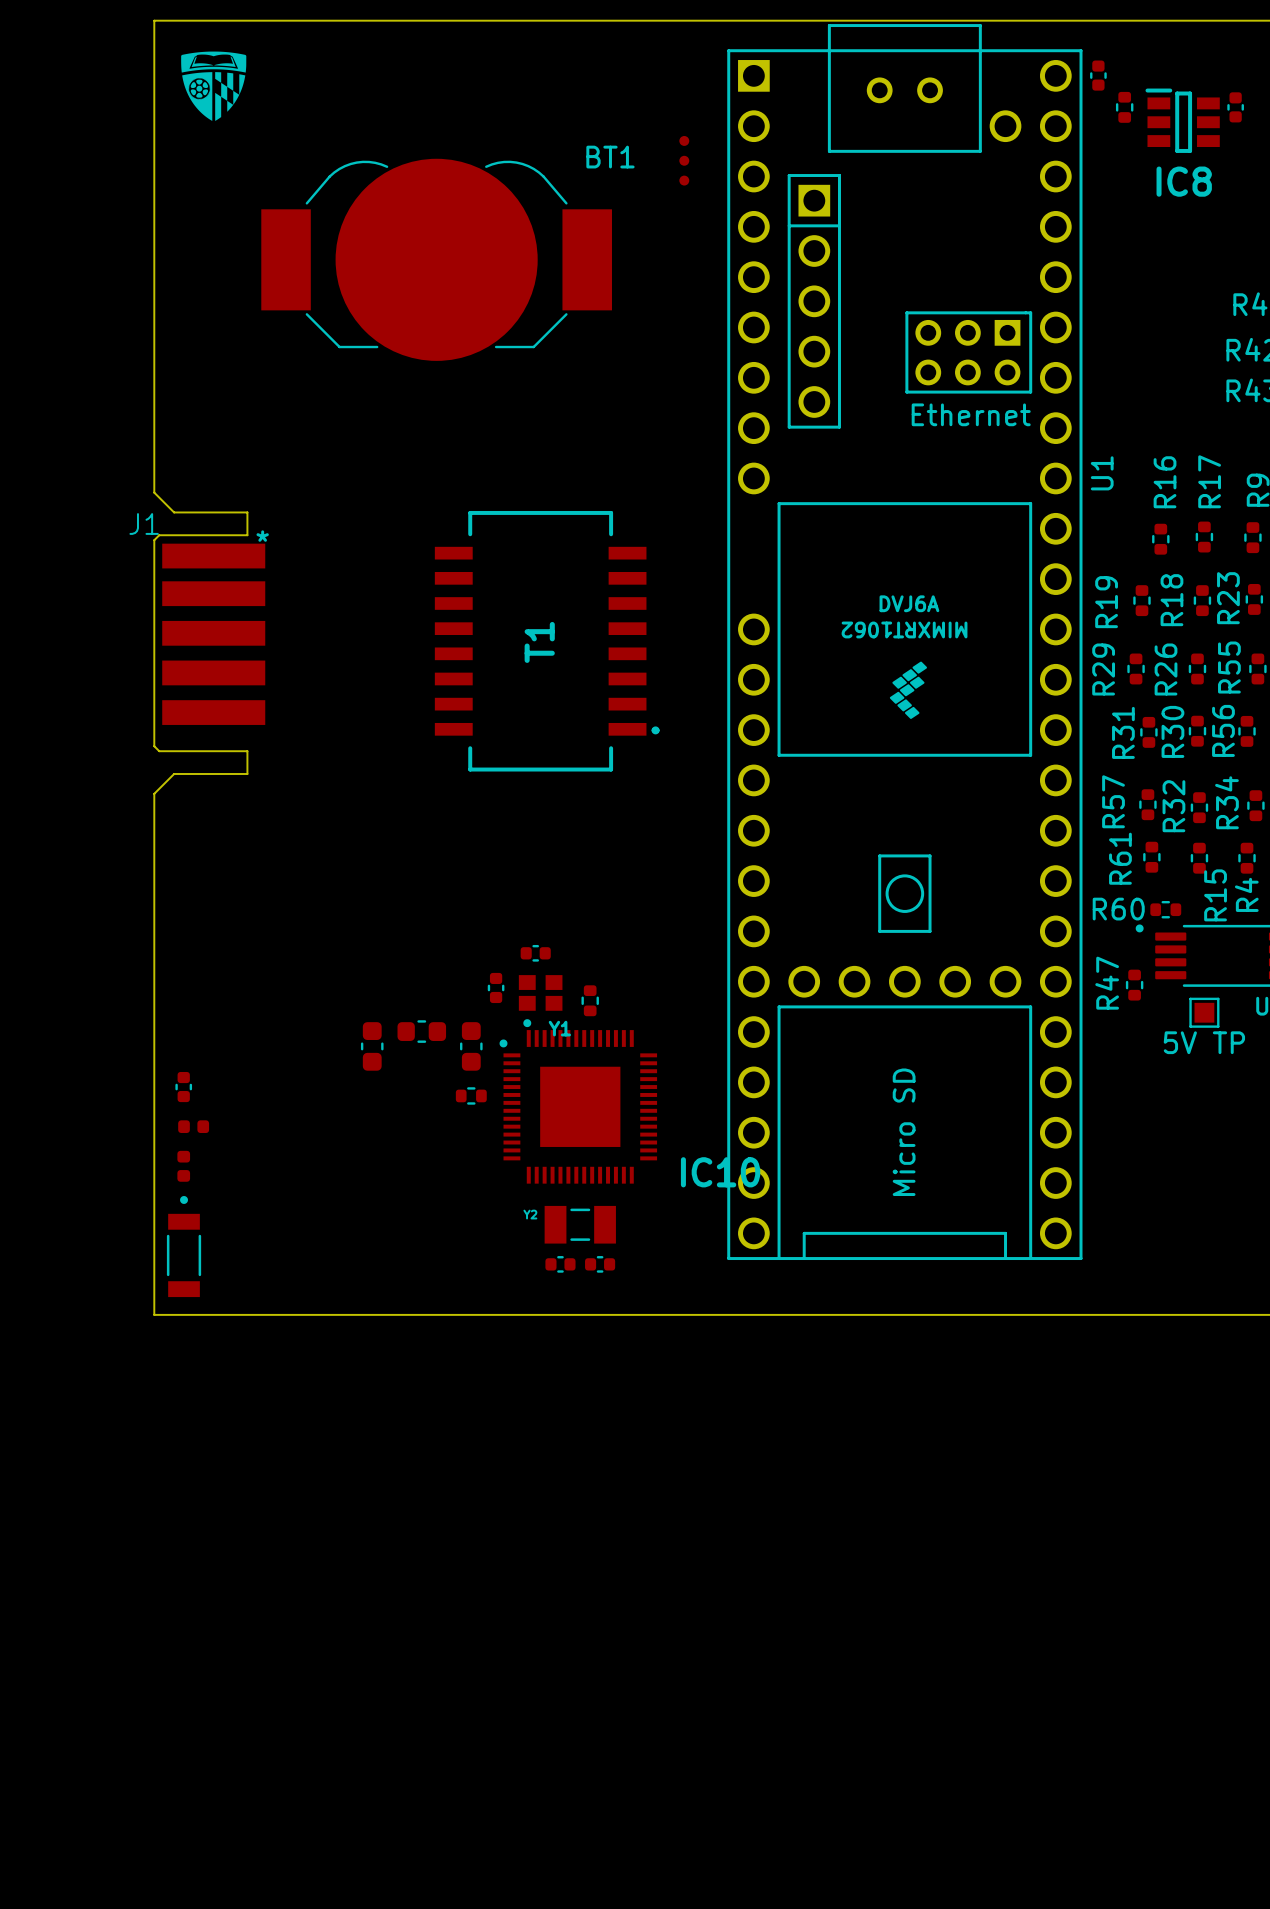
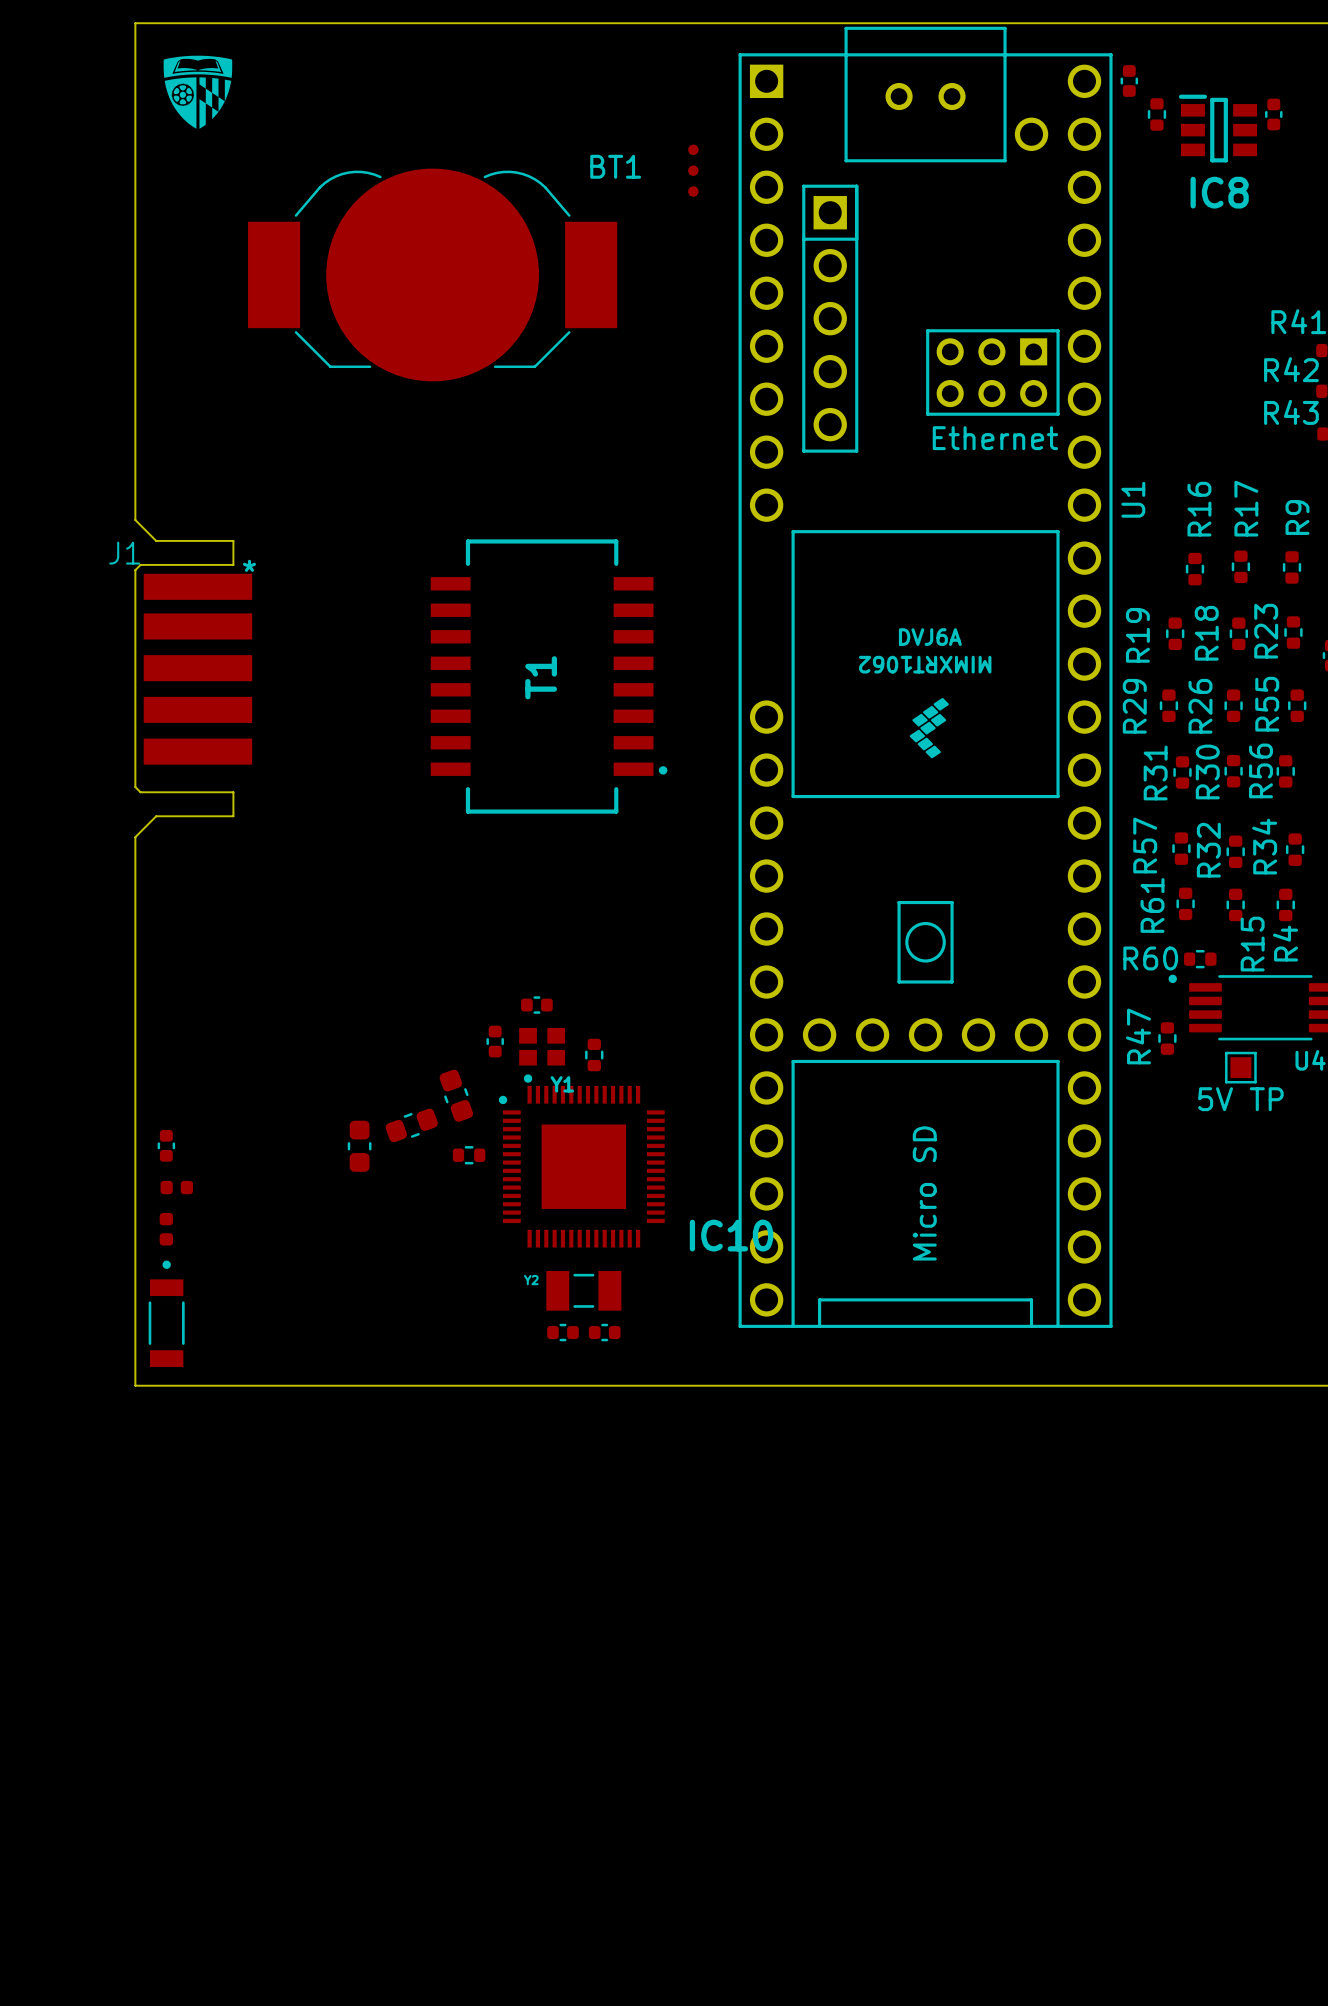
U1 footprint: [727, 24, 1083, 1261] -> [738, 26, 1113, 1328]
part: (421, 1031) -> none
part position: (372, 1046) -> (359, 1146)
part rotation: 0° (471, 1046) -> 20° counterclockwise (456, 1095)
part: none -> (411, 1125)

